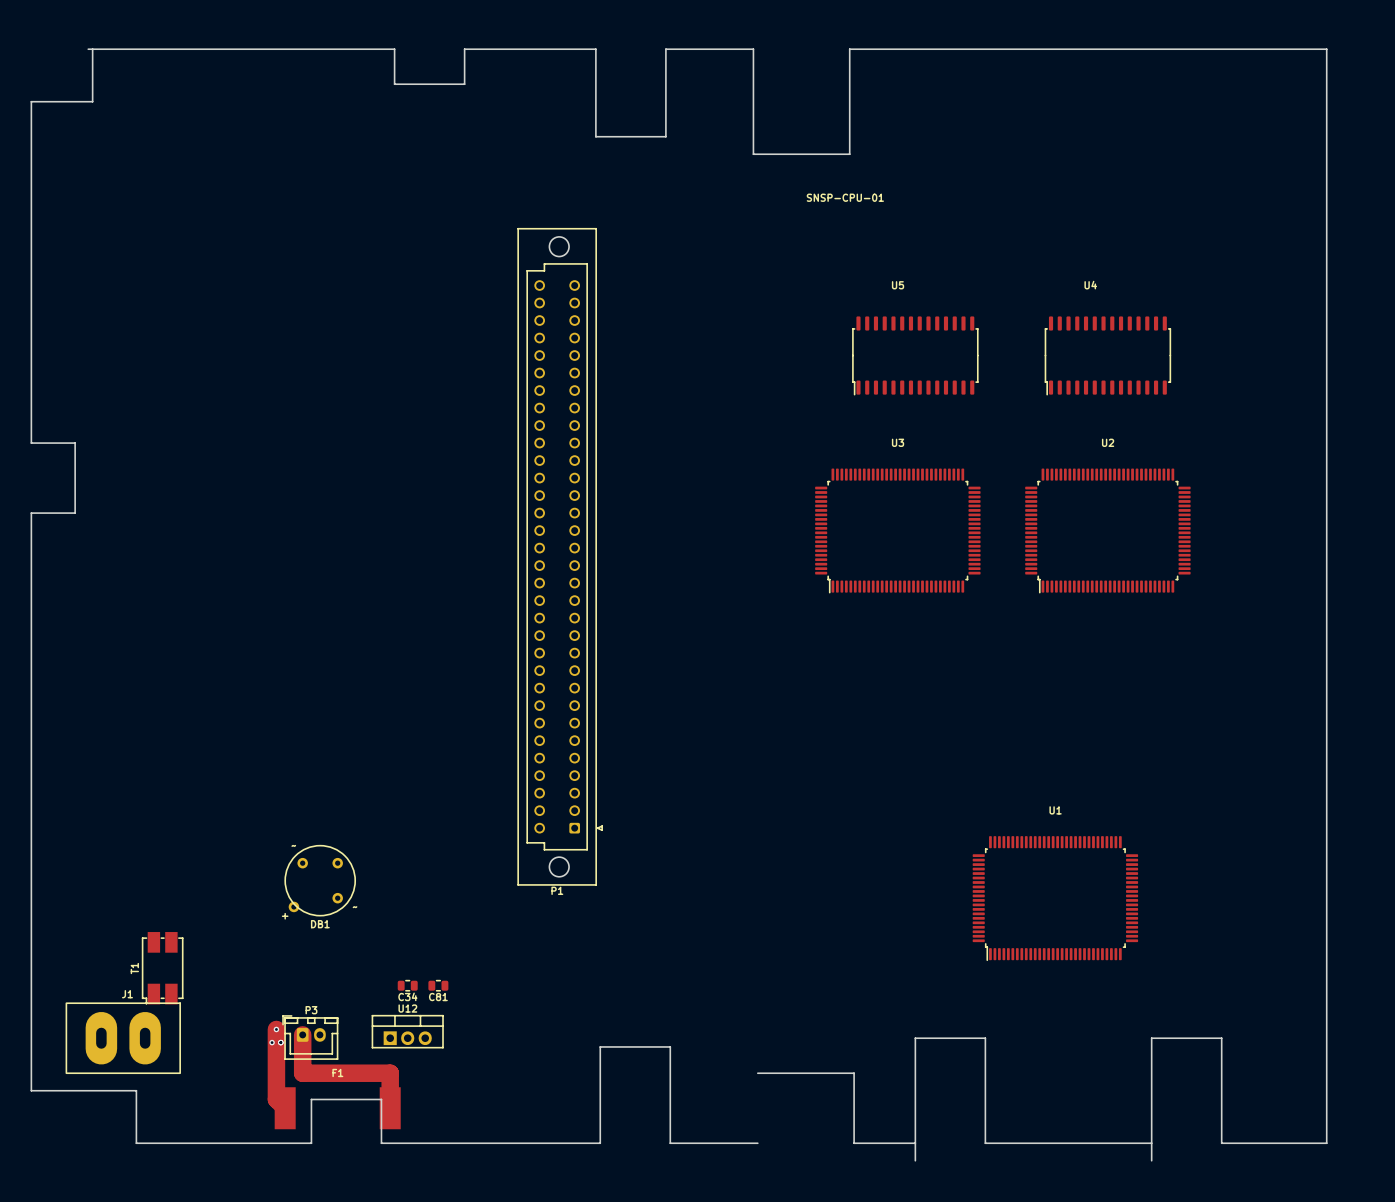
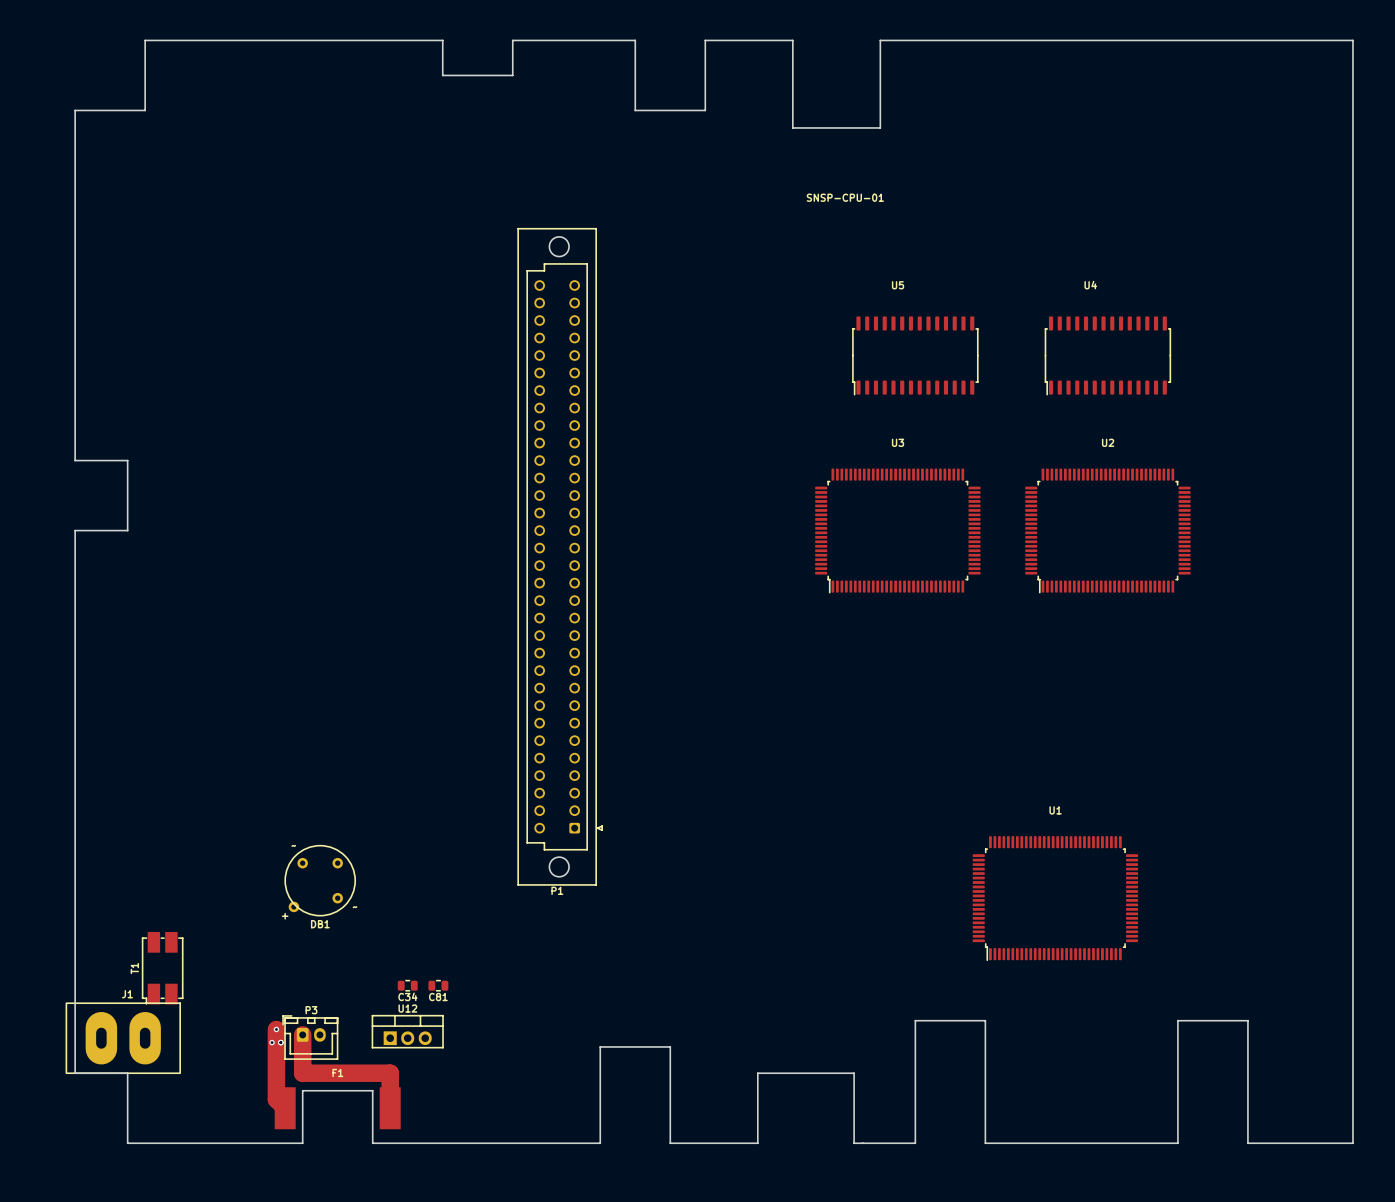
board edge: (88, 49) (394, 49) (394, 84) (464, 84) (464, 49) (595, 49) (595, 136) (665, 136) (665, 49) (753, 49) (753, 154) (849, 154) (849, 49) (1326, 49) (1326, 1143) -> (75, 443) (75, 110) (145, 110) (145, 40) (442, 40) (442, 75) (512, 75) (512, 40) (635, 40) (635, 110) (705, 110) (705, 40) (792, 40) (792, 127) (880, 127) (880, 40) (1352, 40) (1352, 1143) (1326, 1143)
board edge: (92, 49) (92, 101) (31, 101) (31, 443) (75, 443) -> none
board edge: (75, 460) (75, 513) (31, 513) (31, 1090) (136, 1090) (136, 1143) -> (75, 460) (127, 460) (127, 530) (75, 530) (75, 1073) (127, 1073) (127, 1143) (136, 1143)
board edge: (915, 1038) (985, 1038) -> (915, 1038) (915, 1020) (985, 1020) (985, 1038)
board edge: none -> (757, 1073) (757, 1143)
board edge: (302, 1143) (311, 1143) (311, 1099) (381, 1099) (381, 1143) -> (302, 1143) (302, 1090) (372, 1090) (372, 1143) (381, 1143)
board edge: (915, 1143) (915, 1160) -> none
board edge: (1247, 1143) (1221, 1143) (1221, 1038) (1151, 1038) (1151, 1160) -> (1247, 1143) (1247, 1020) (1177, 1020) (1177, 1143) (1151, 1143)

